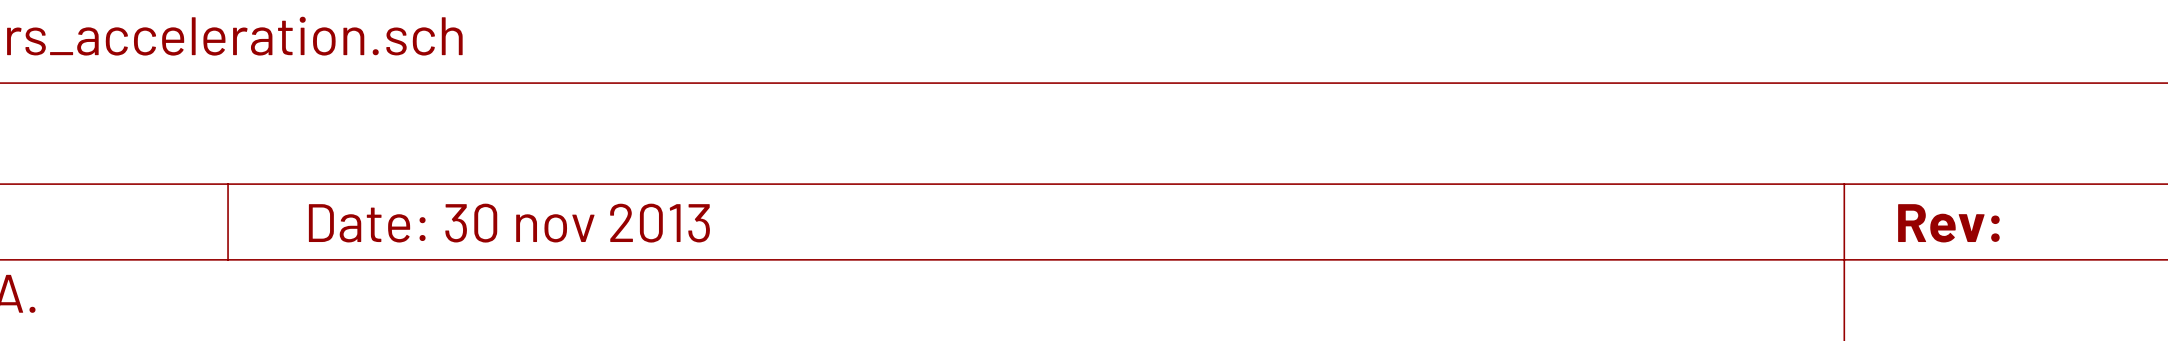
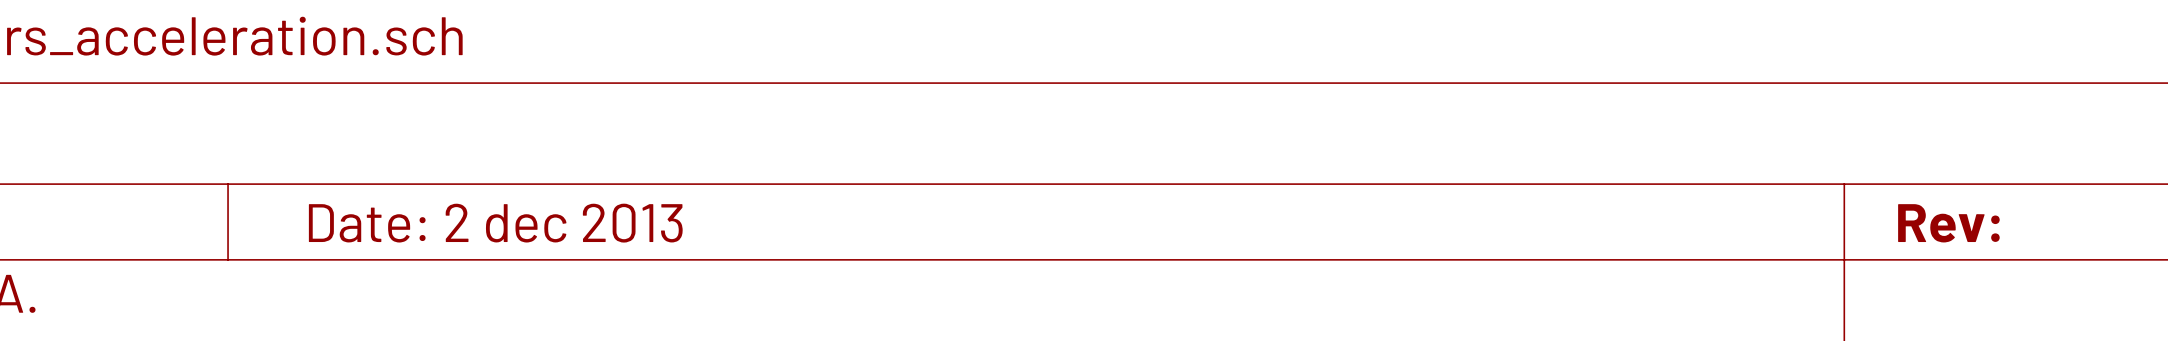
title block: Date: 30 nov 2013 (509, 223) -> Date: 2 dec 2013 (495, 223)

